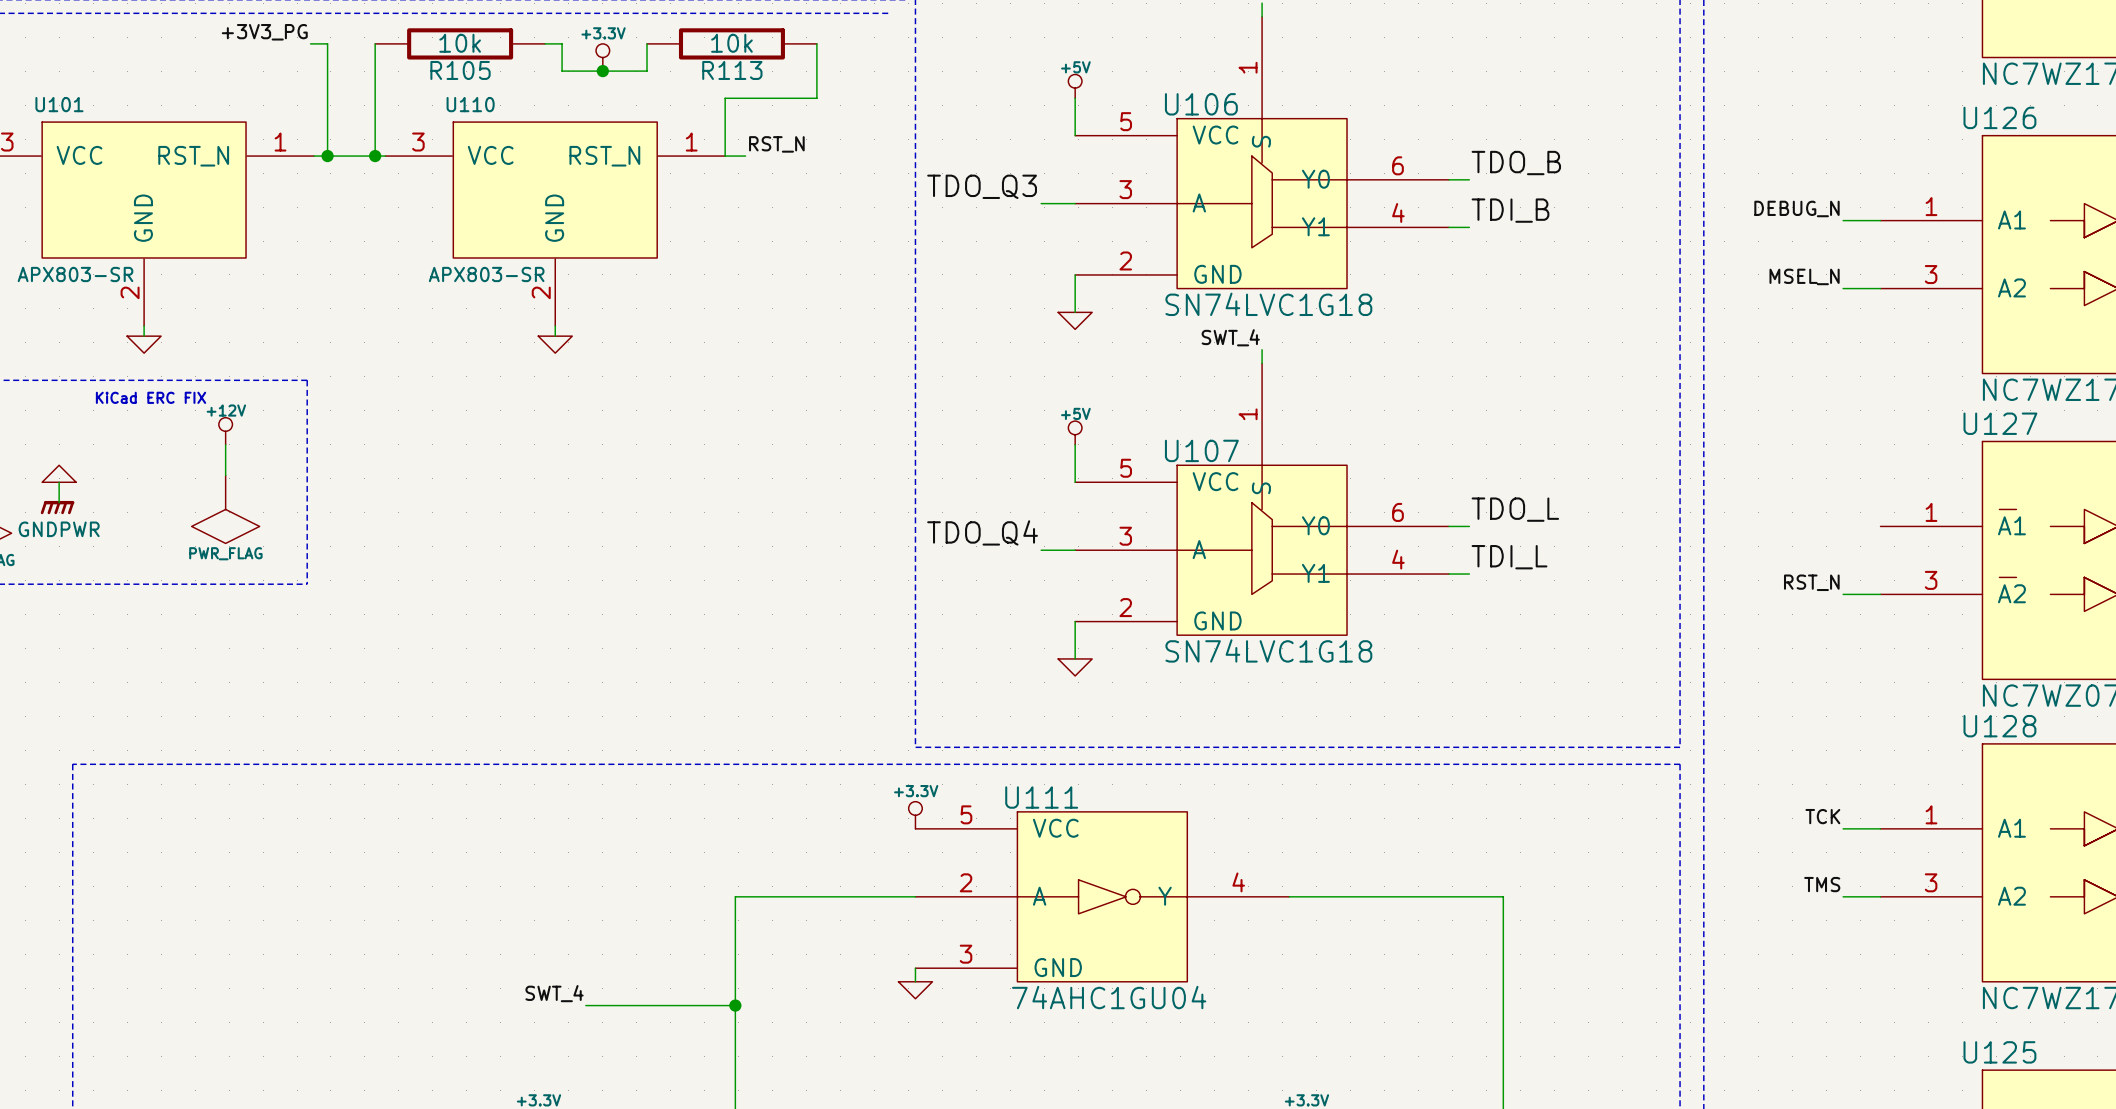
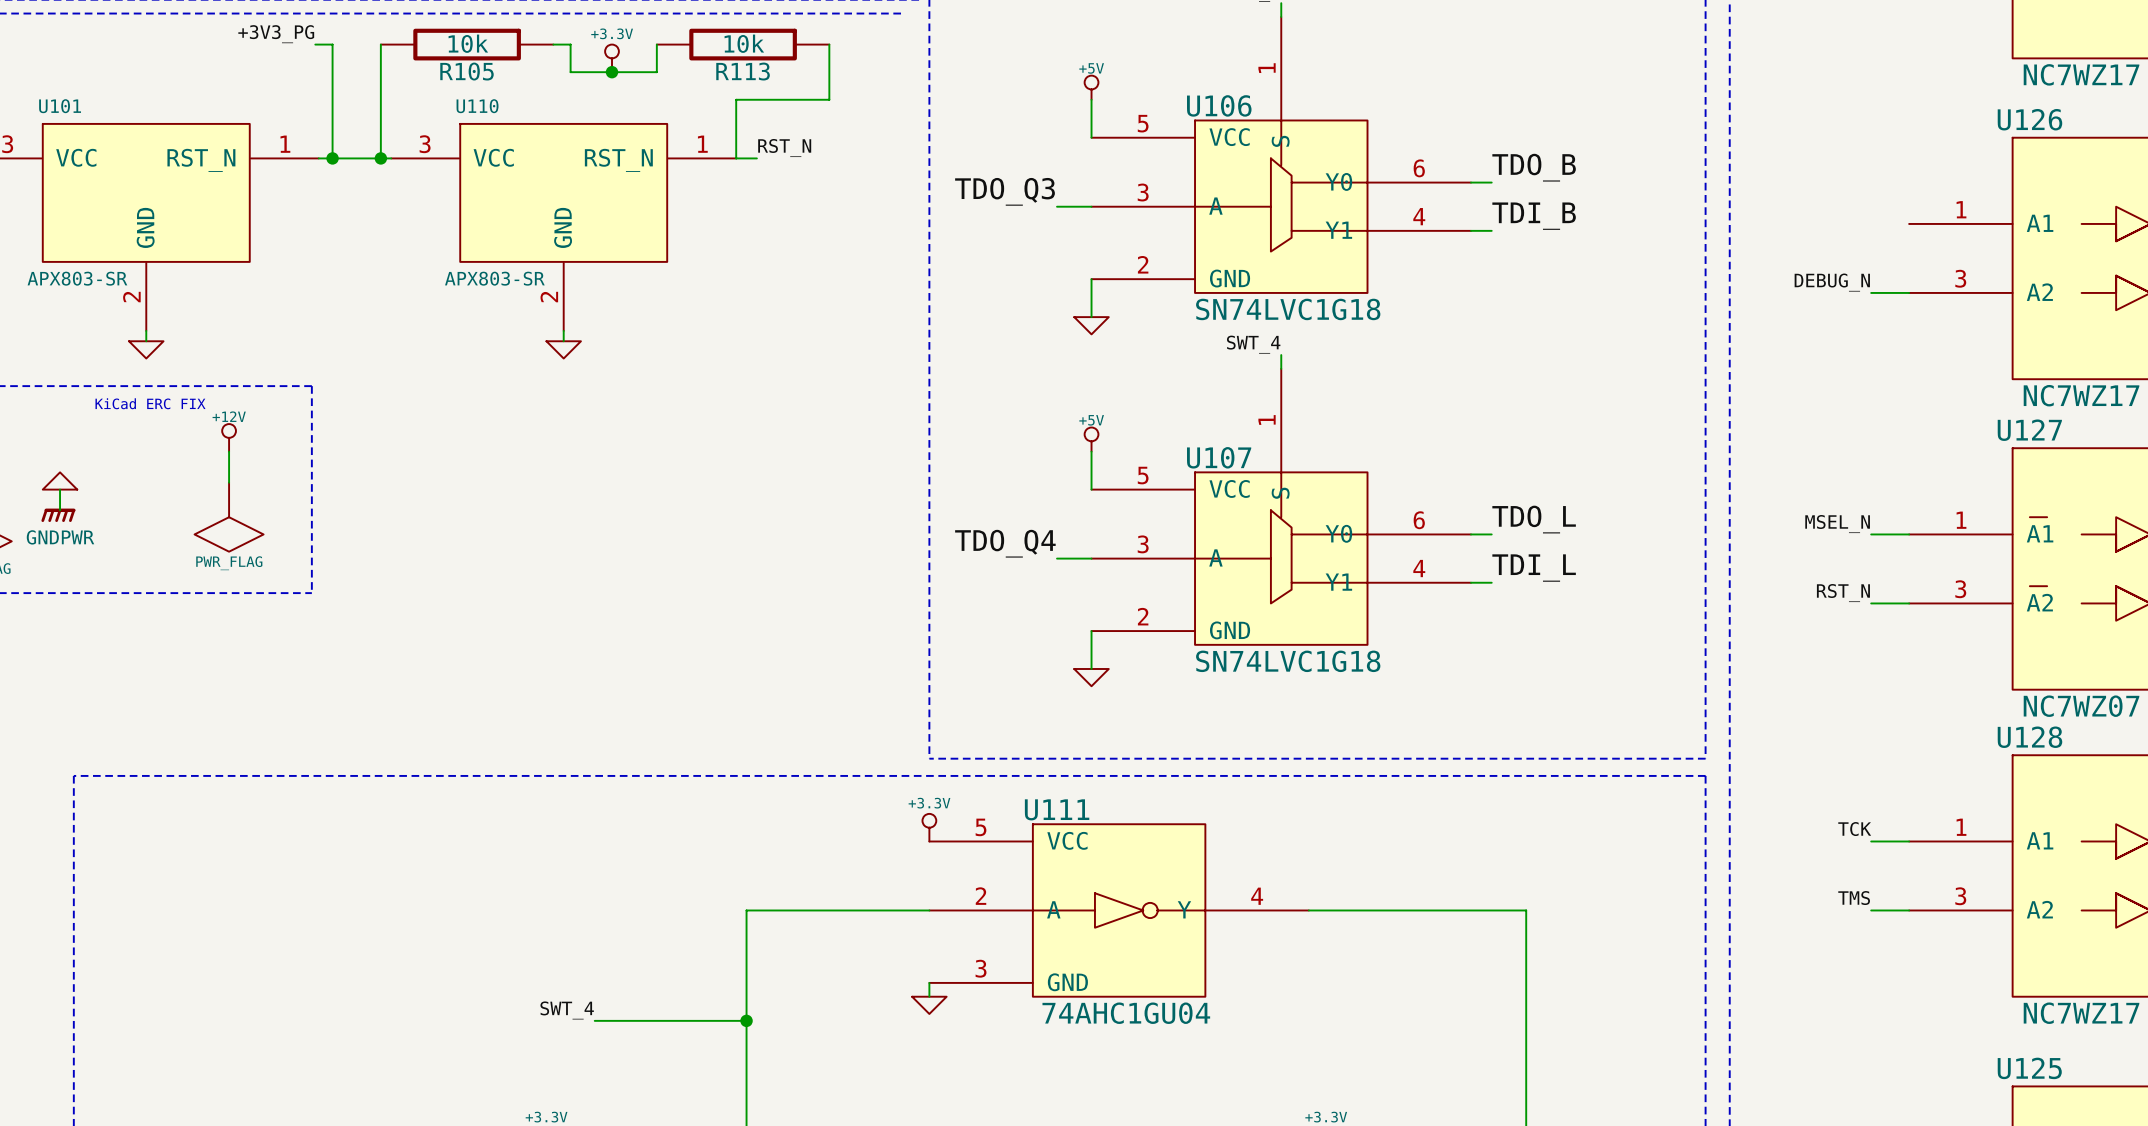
label: DEBUG_N (1796, 208) -> none
wire: (1843, 220) (1880, 220) -> (1871, 534) (1909, 534)
label: MSEL_N (1804, 276) -> DEBUG_N (1832, 282)
label: none -> MSEL_N (1837, 524)

